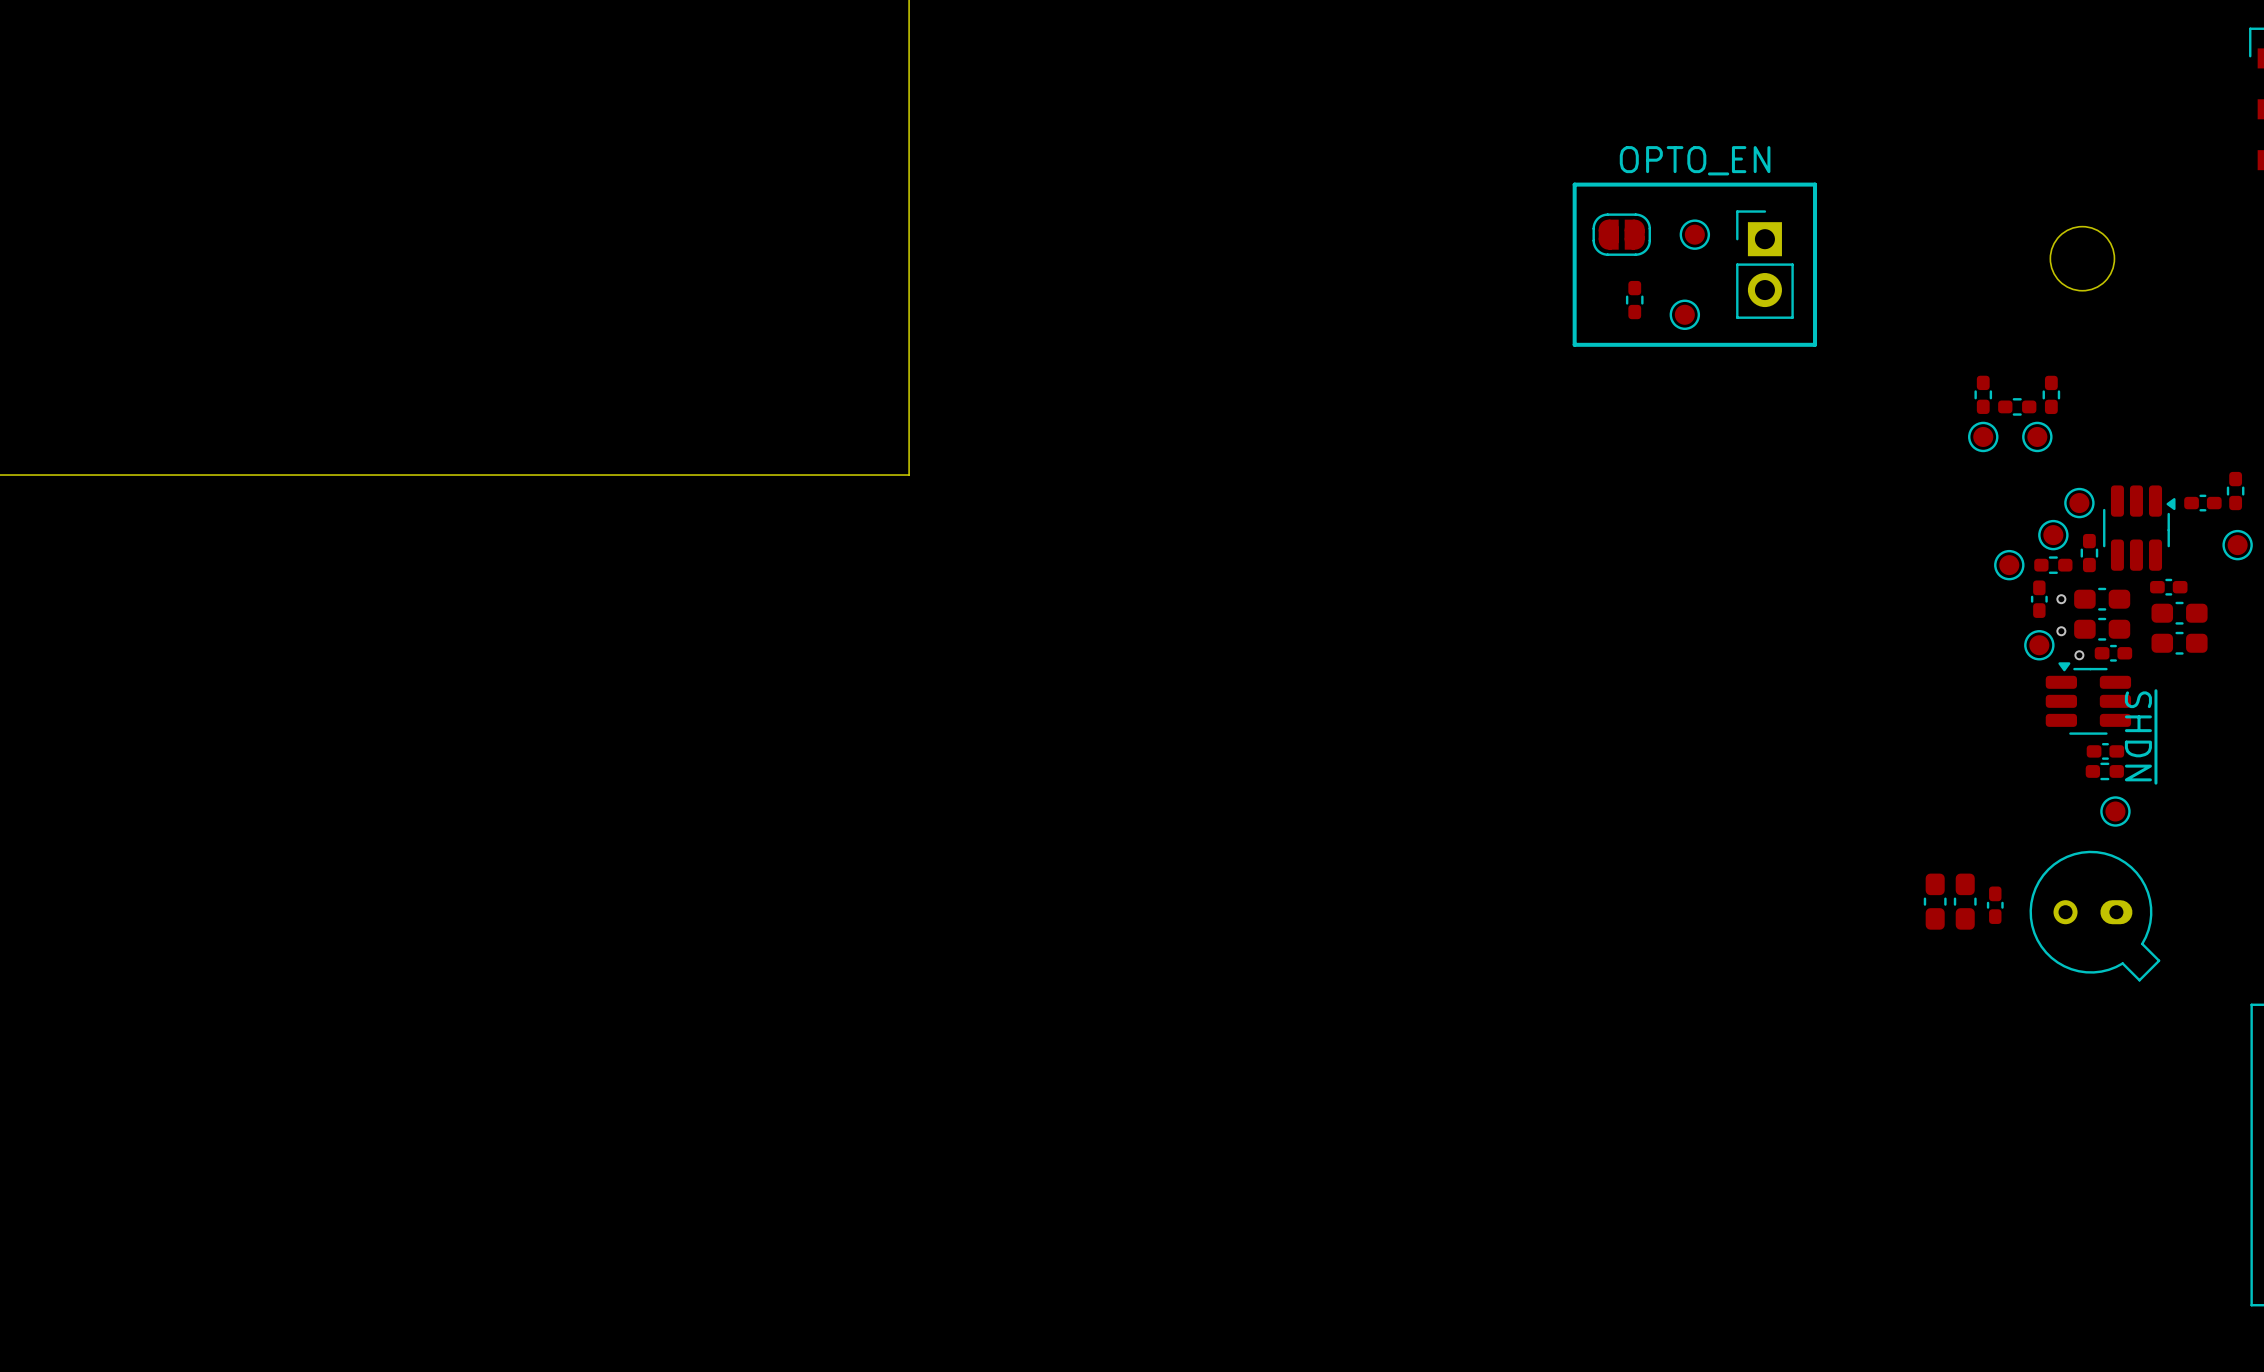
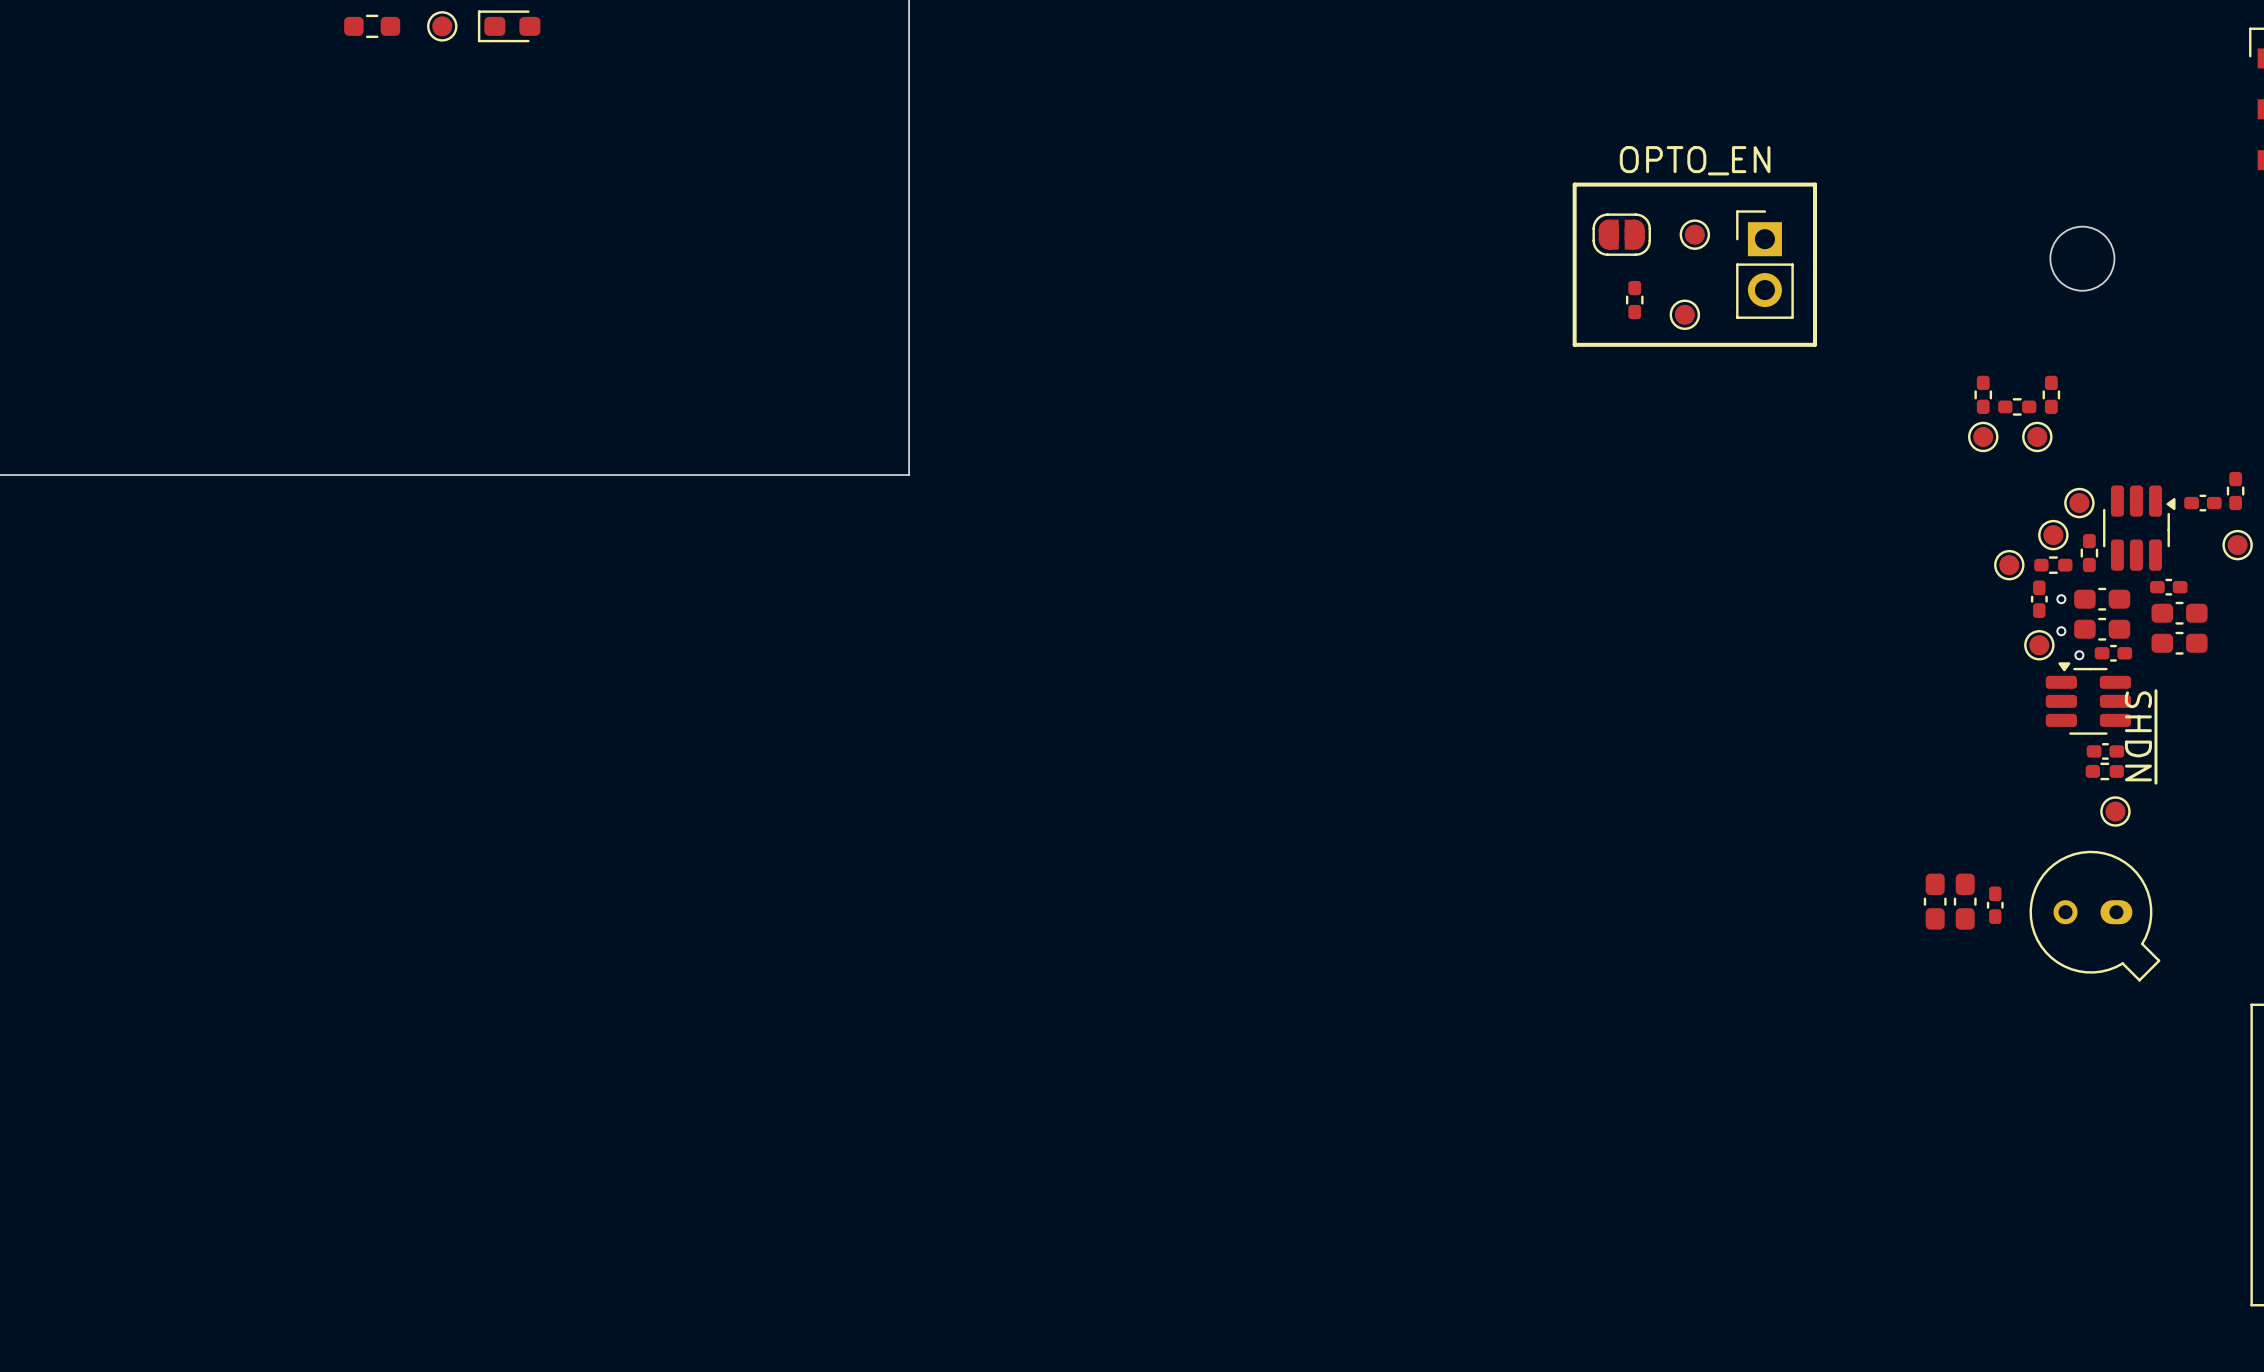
part: none -> (372, 26)
part: none -> (442, 26)
part: none -> (509, 26)

